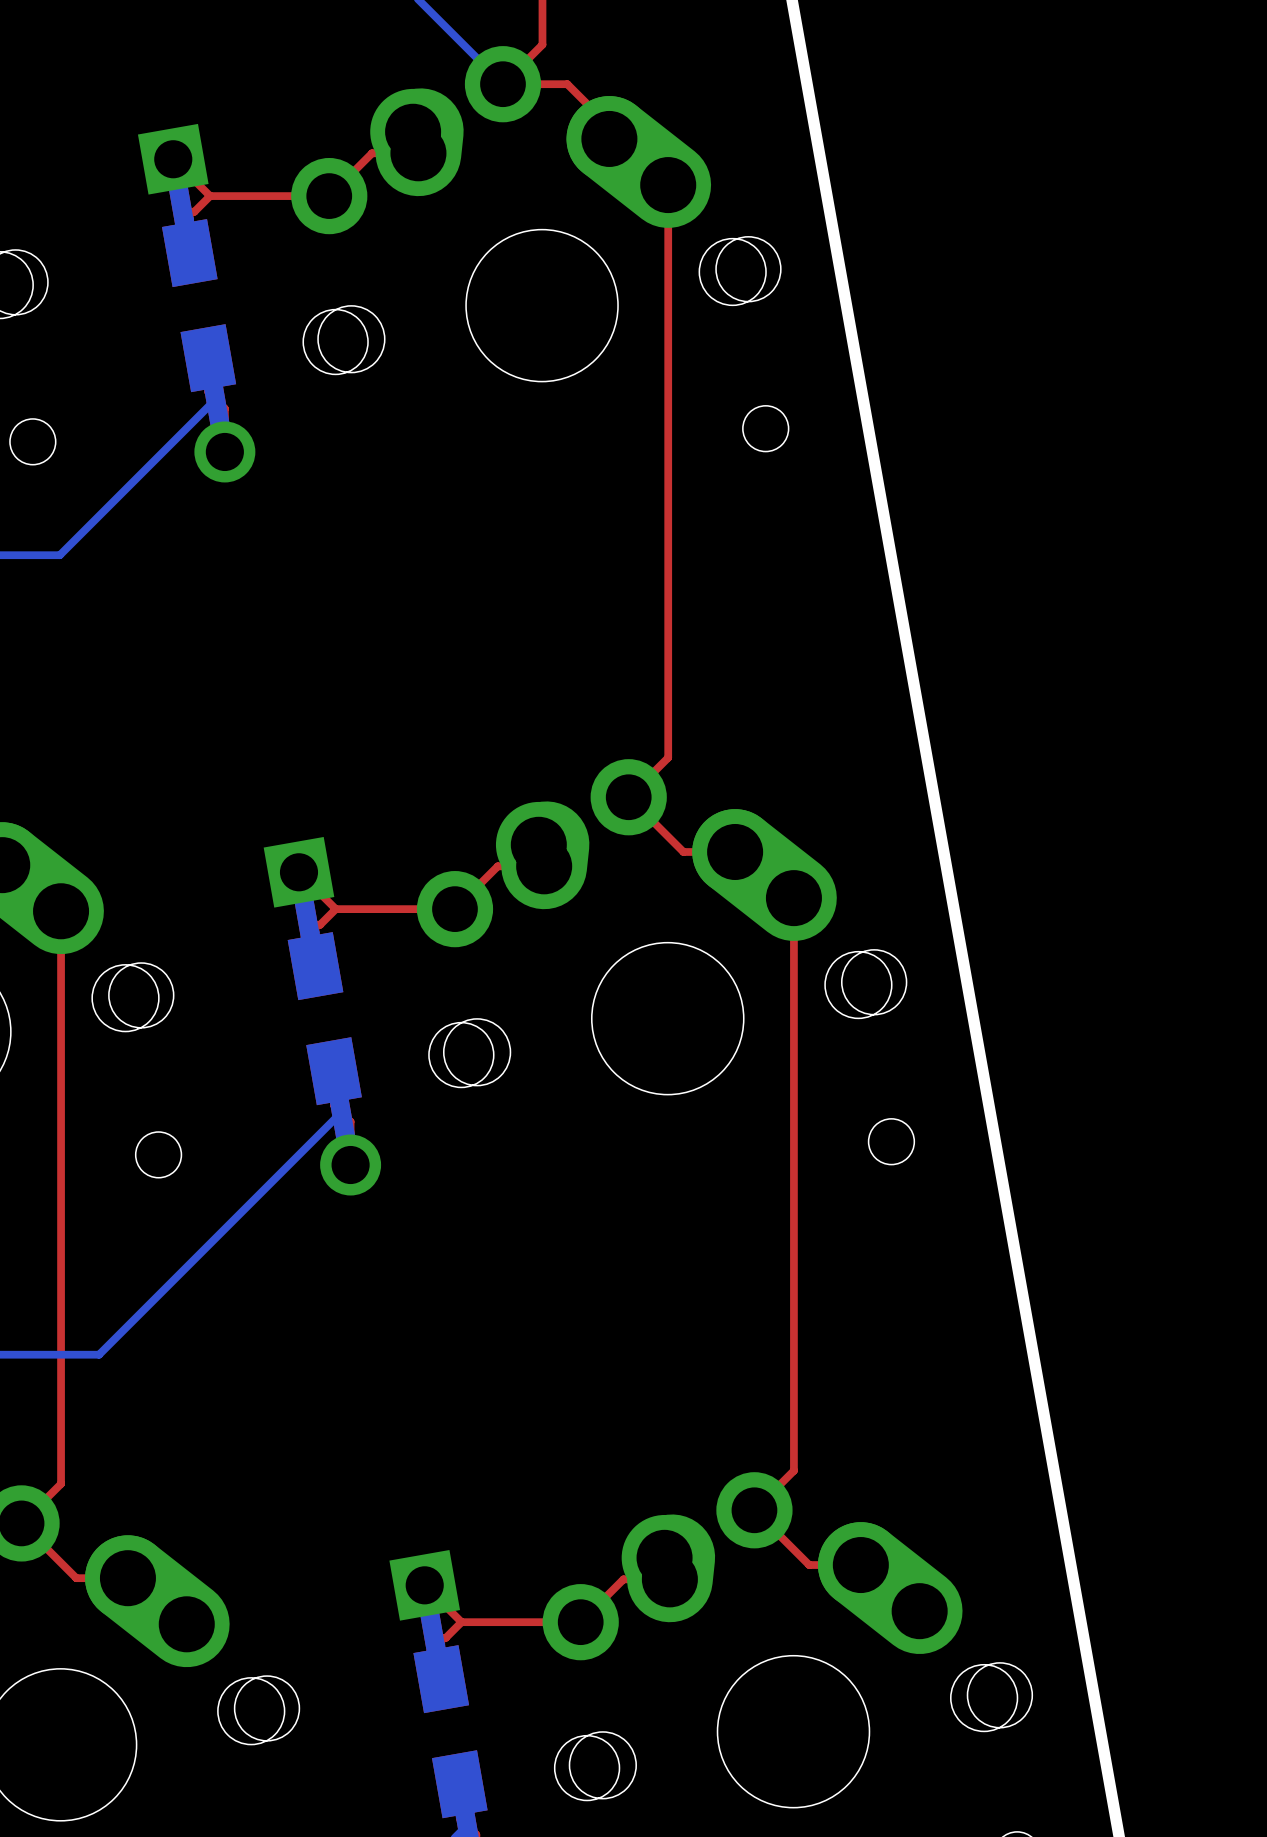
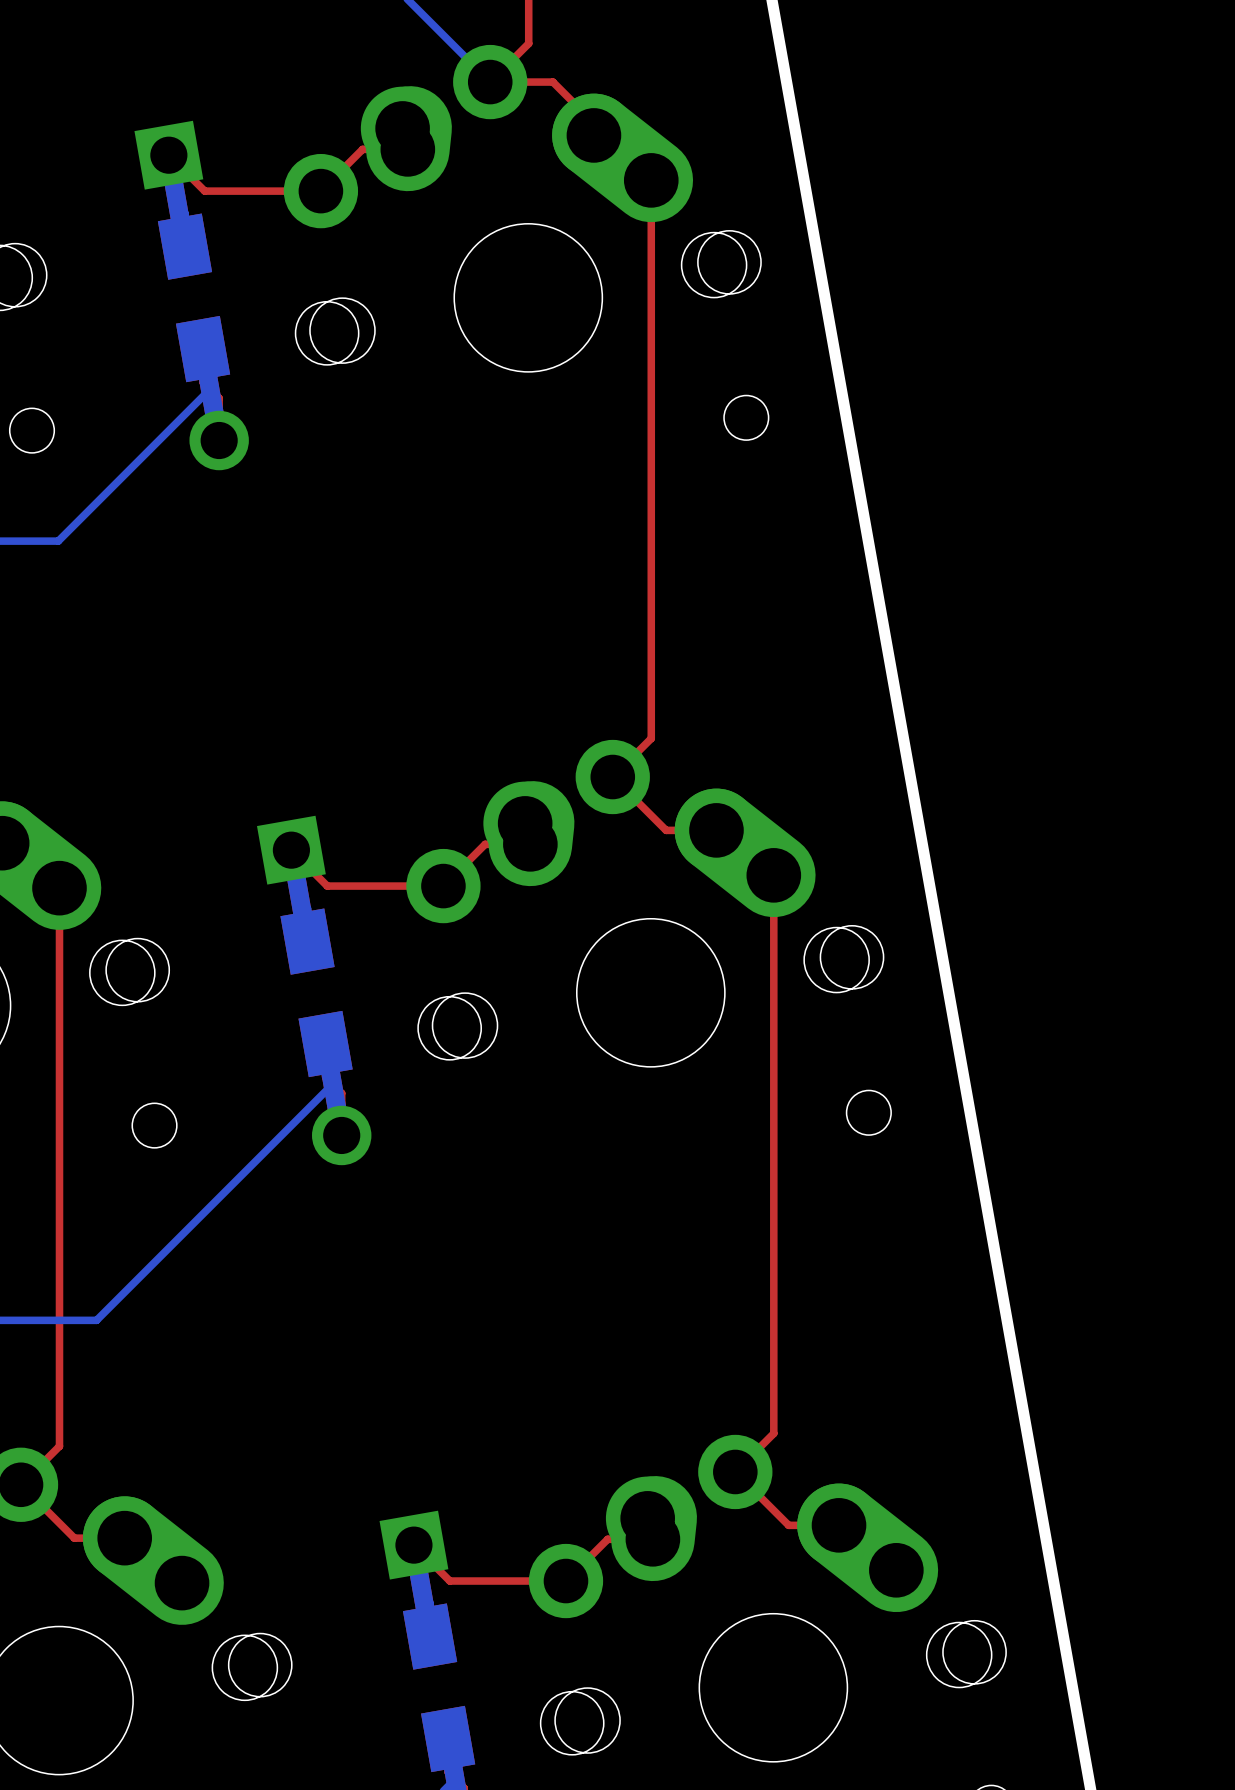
top track: (210, 196) (194, 211) (182, 211) -> none
top track: (335, 909) (320, 924) (308, 924) -> none
top track: (461, 1622) (445, 1637) (433, 1637) -> none

